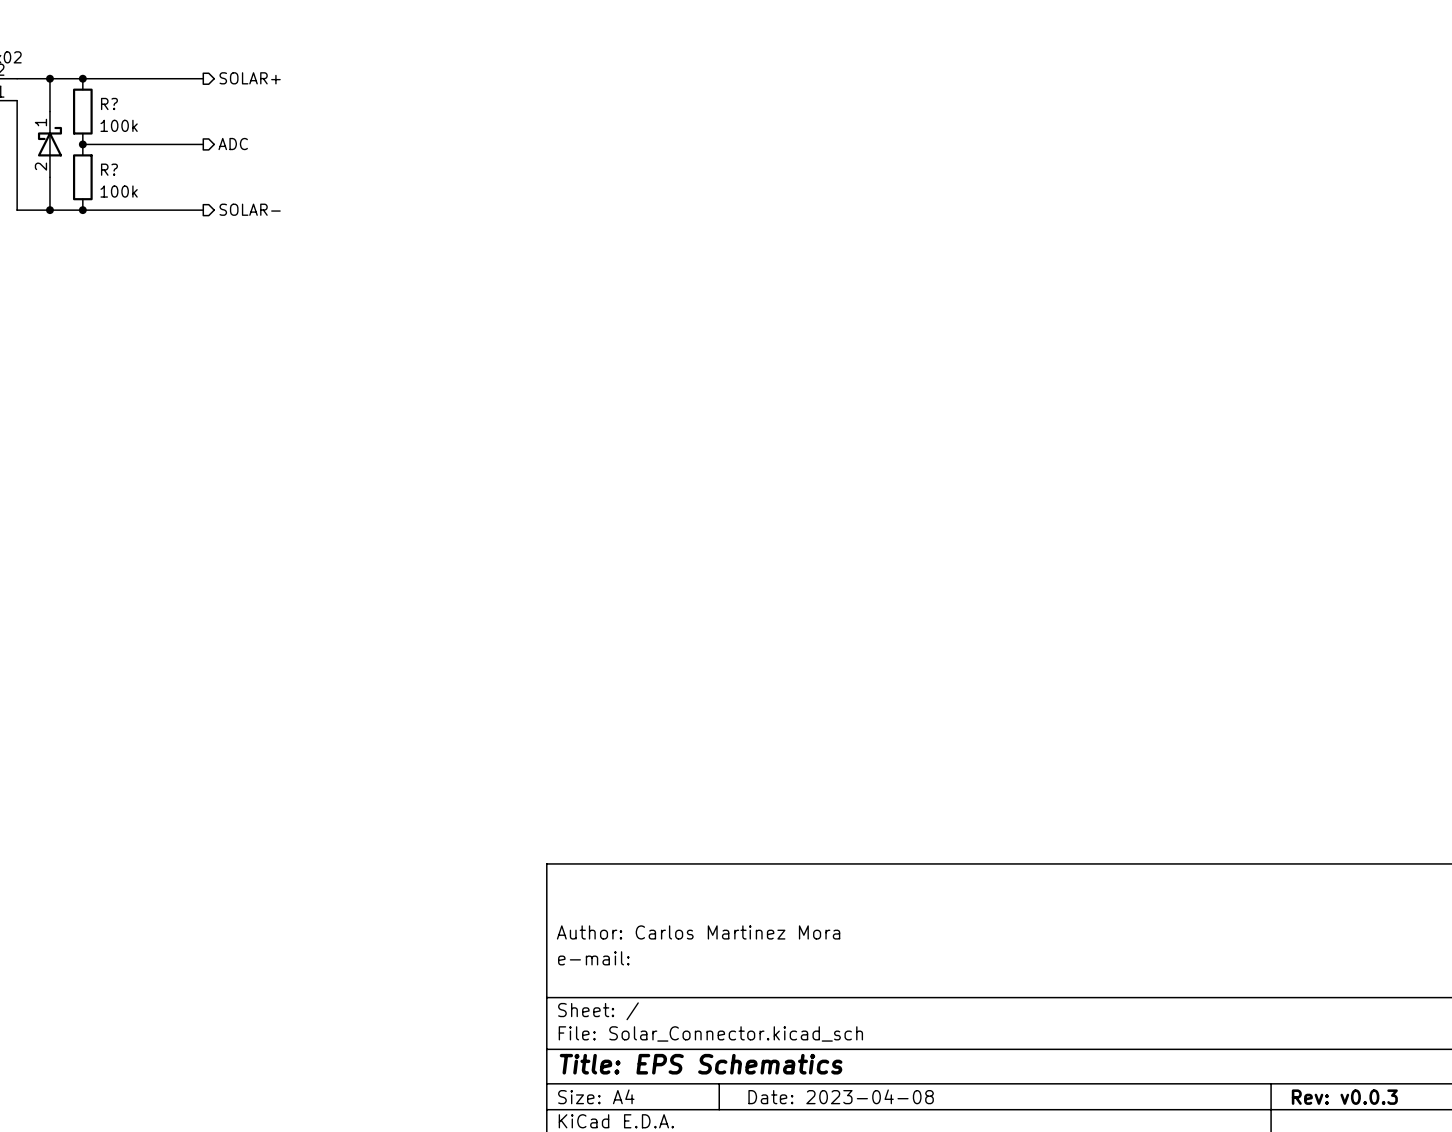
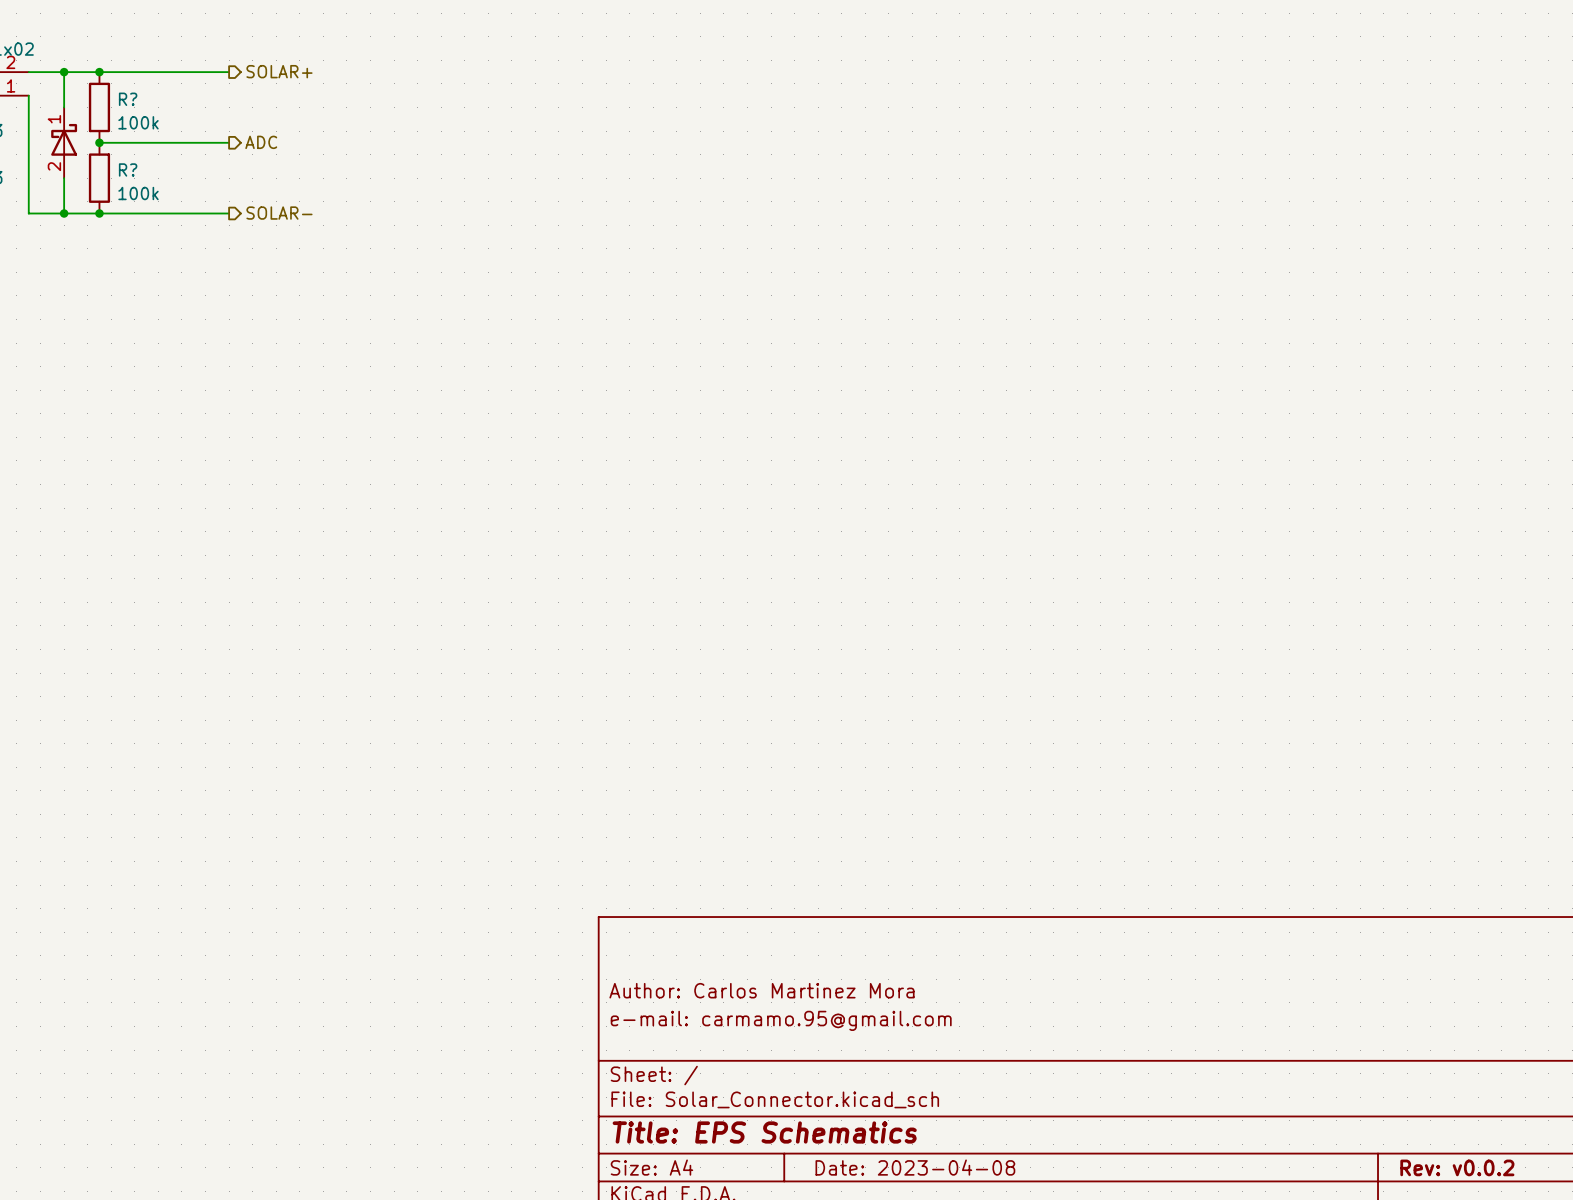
title block: e-mail: (593, 958) -> e-mail: carmamo.95@gmail.com (781, 1020)
title block: Rev: v0.0.3 (1344, 1097) -> Rev: v0.0.2 (1457, 1167)

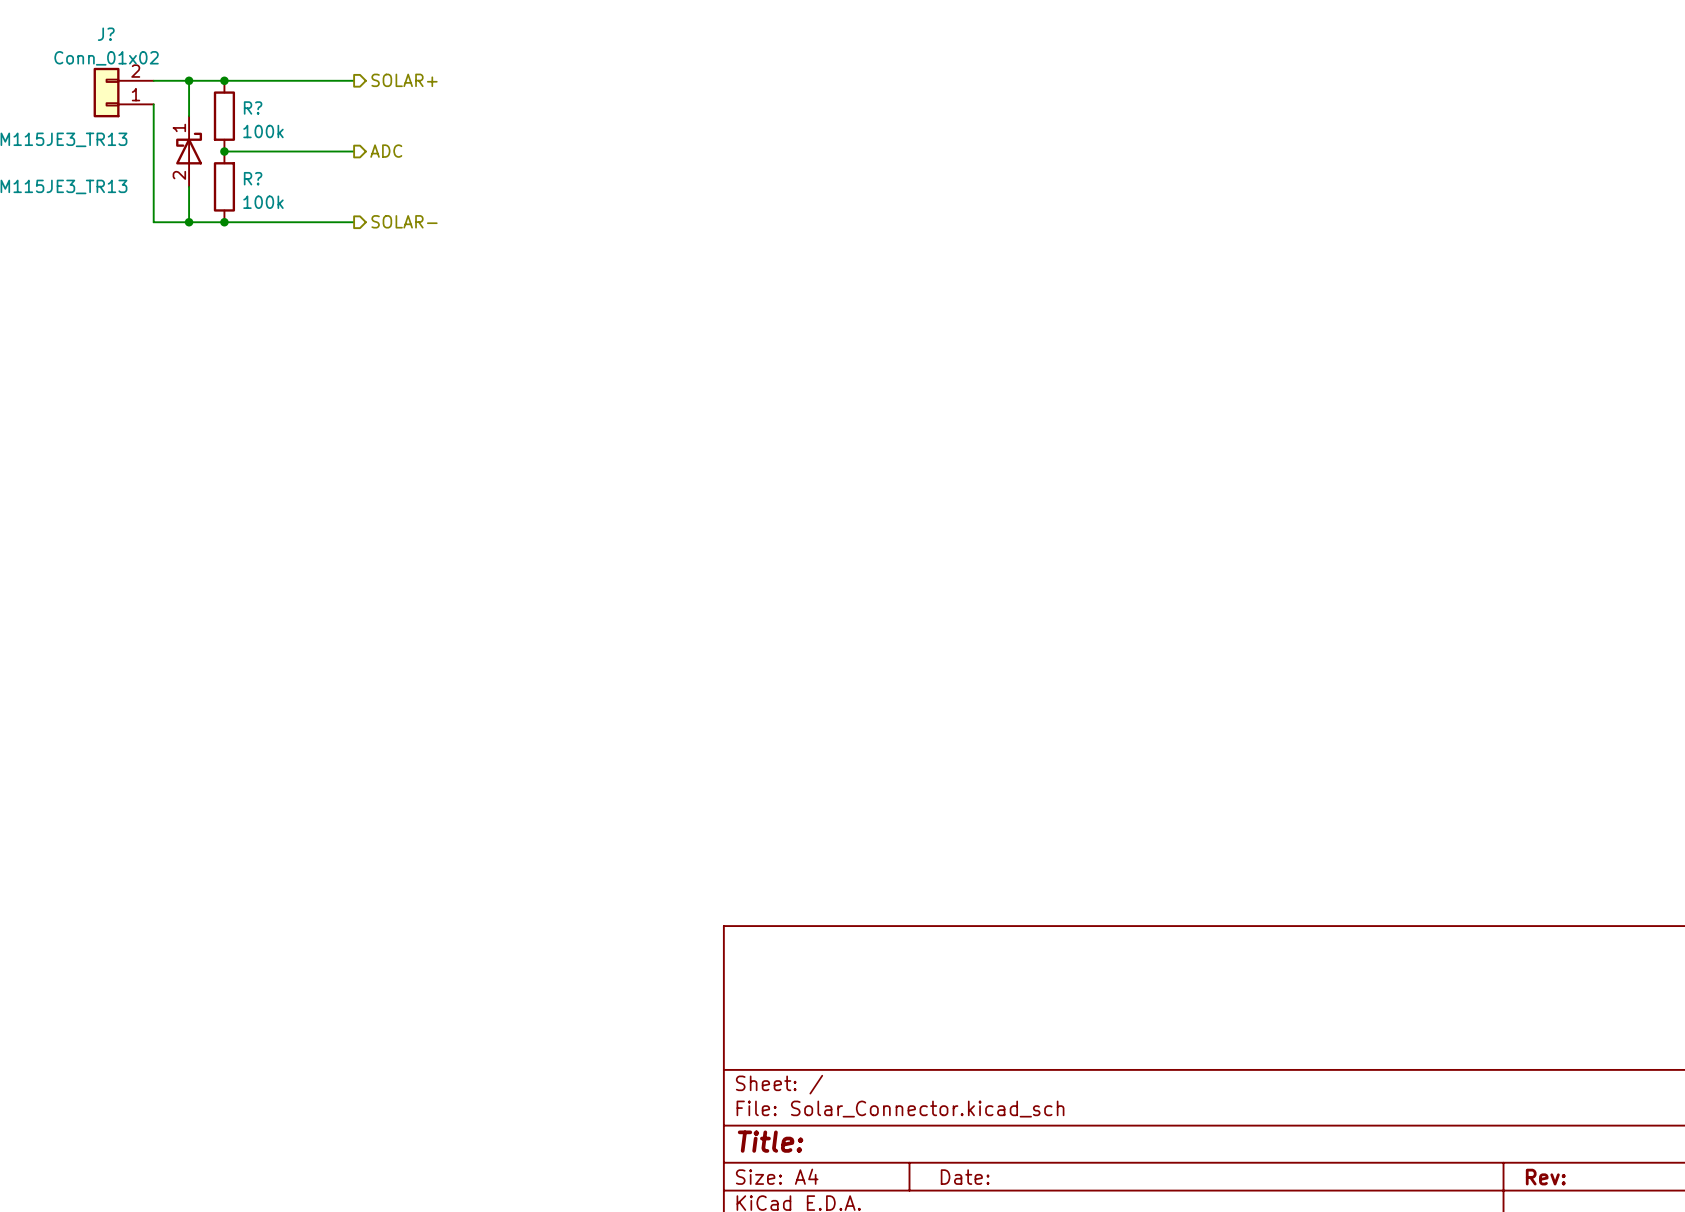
title block: Author: Carlos Martinez Mora (761, 990) -> none
title block: e-mail: carmamo.95@gmail.com (781, 1020) -> none
title block: Title: EPS Schematics (764, 1132) -> Title: (770, 1141)
title block: Date: 2023-04-08 (915, 1167) -> Date: (965, 1177)
title block: Rev: v0.0.2 (1457, 1167) -> Rev: (1545, 1177)

